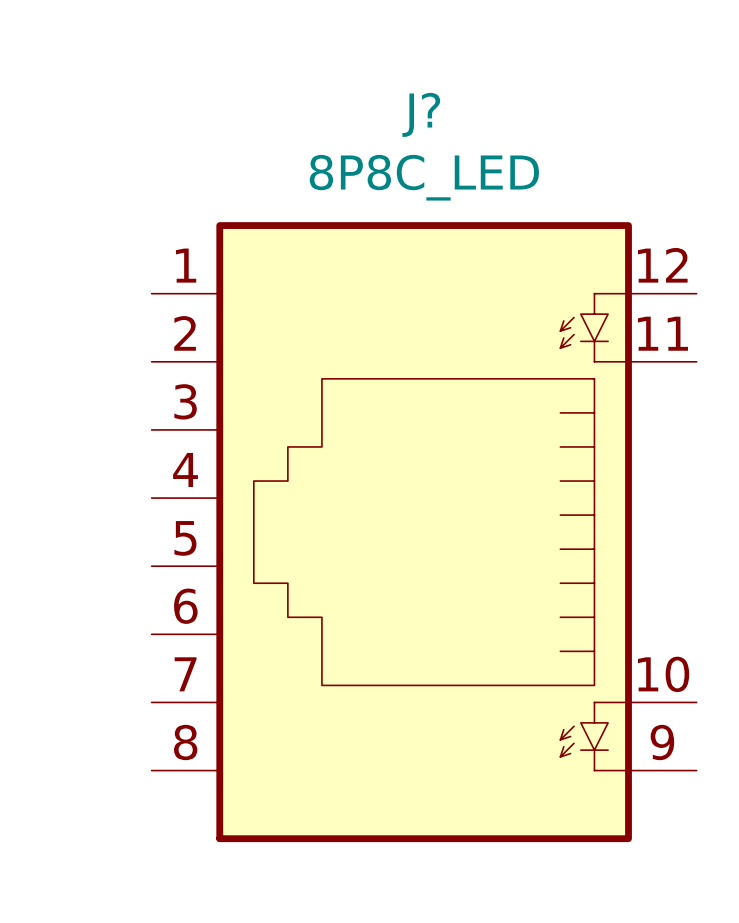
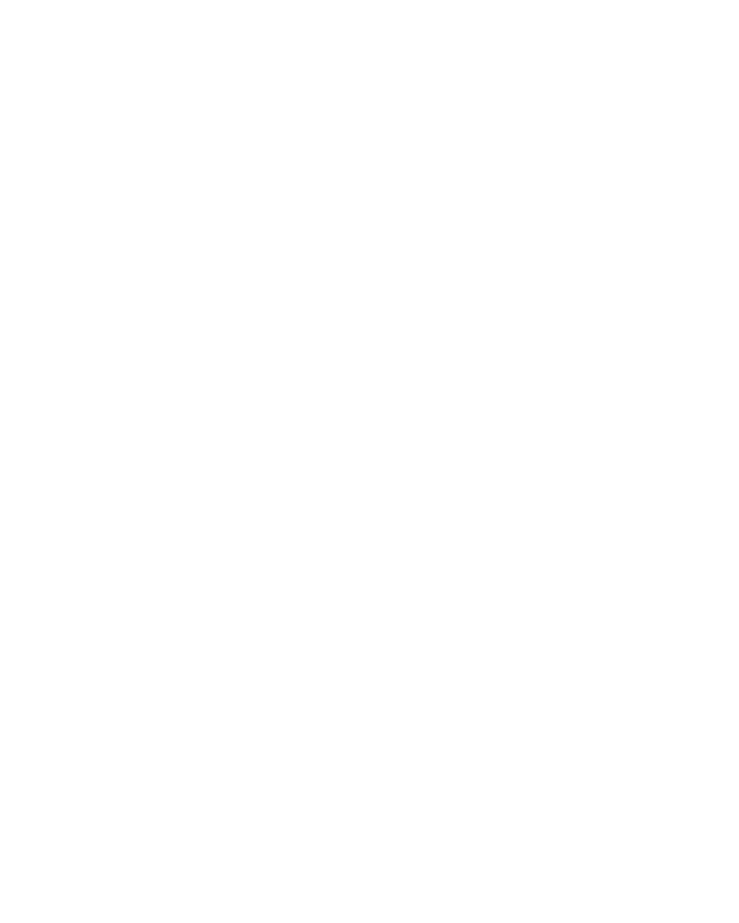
J?: 8P8C_LED (424, 532) -> none

